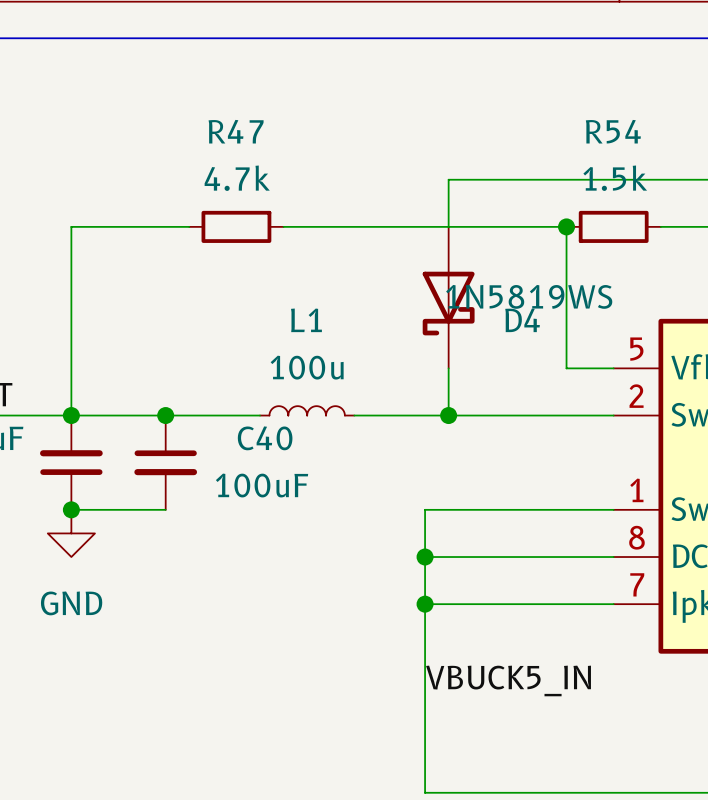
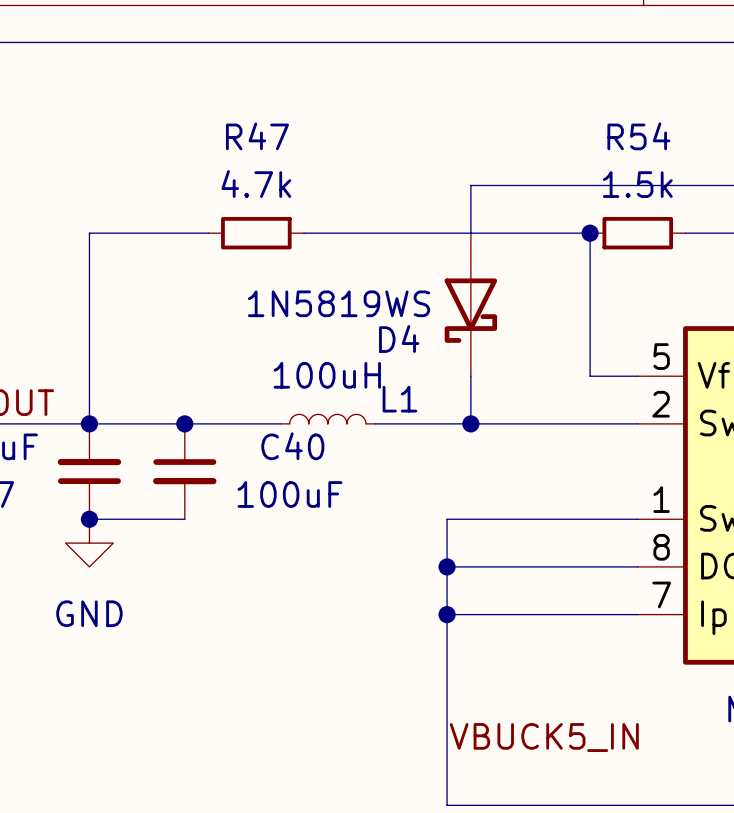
D4 value position: 1N5819WS (529, 296) -> 1N5819WS (339, 303)
L1 name position: L1 (306, 320) -> L1 (399, 399)
D4 name position: D4 (522, 320) -> D4 (399, 338)
L1 value: 100u (307, 367) -> 100uH (327, 375)
label position: VBUCK5_IN (508, 680) -> VBUCK5_IN (544, 737)

